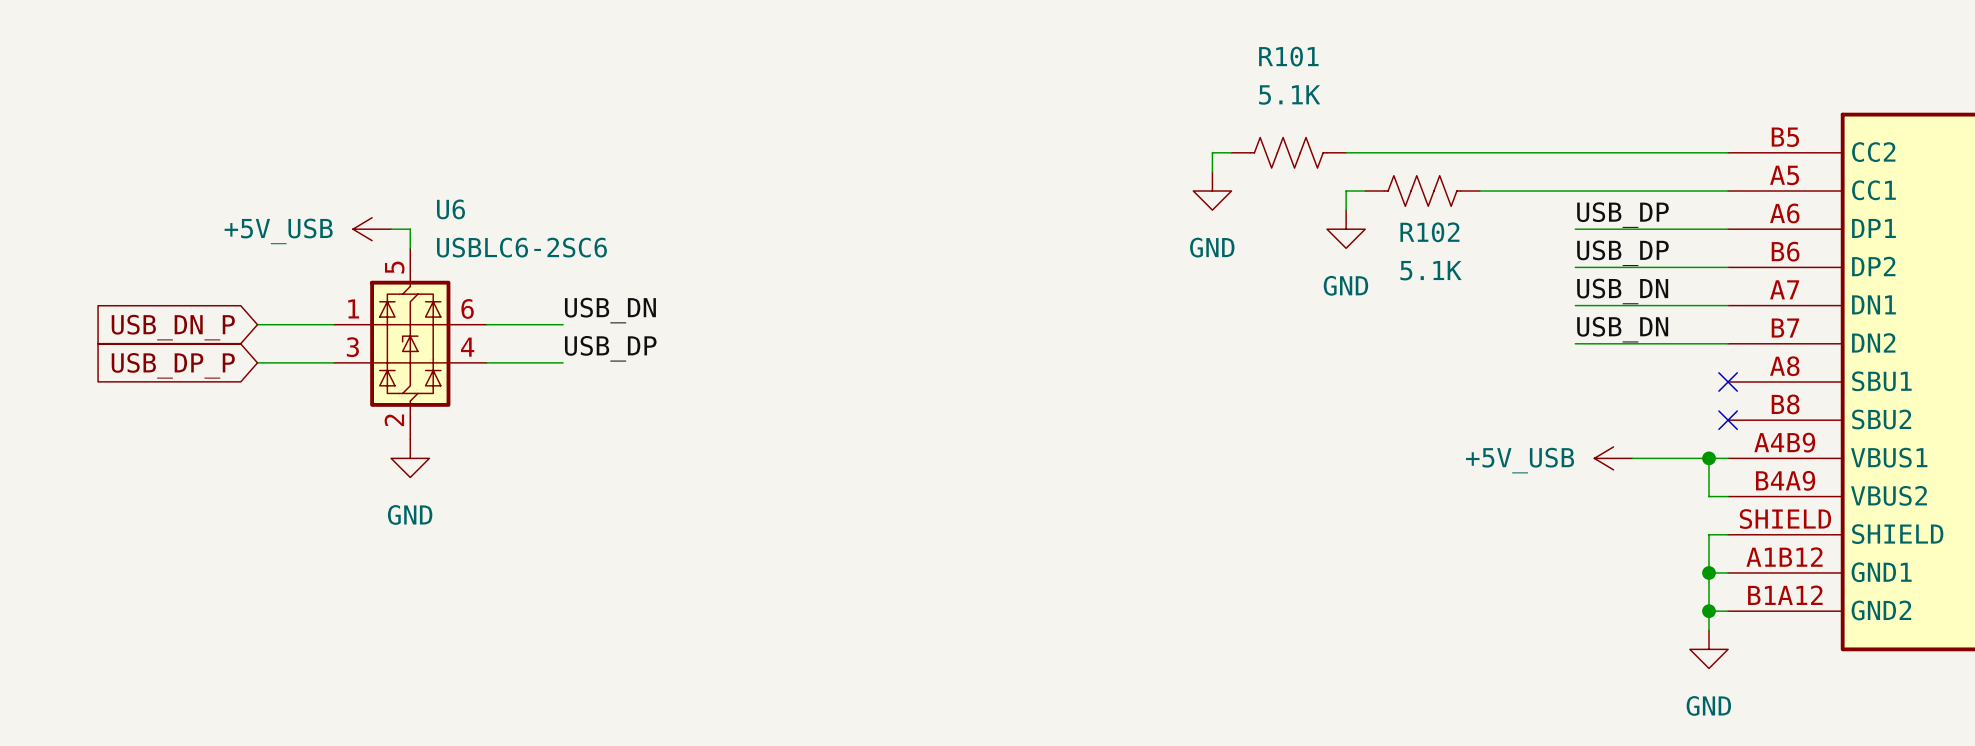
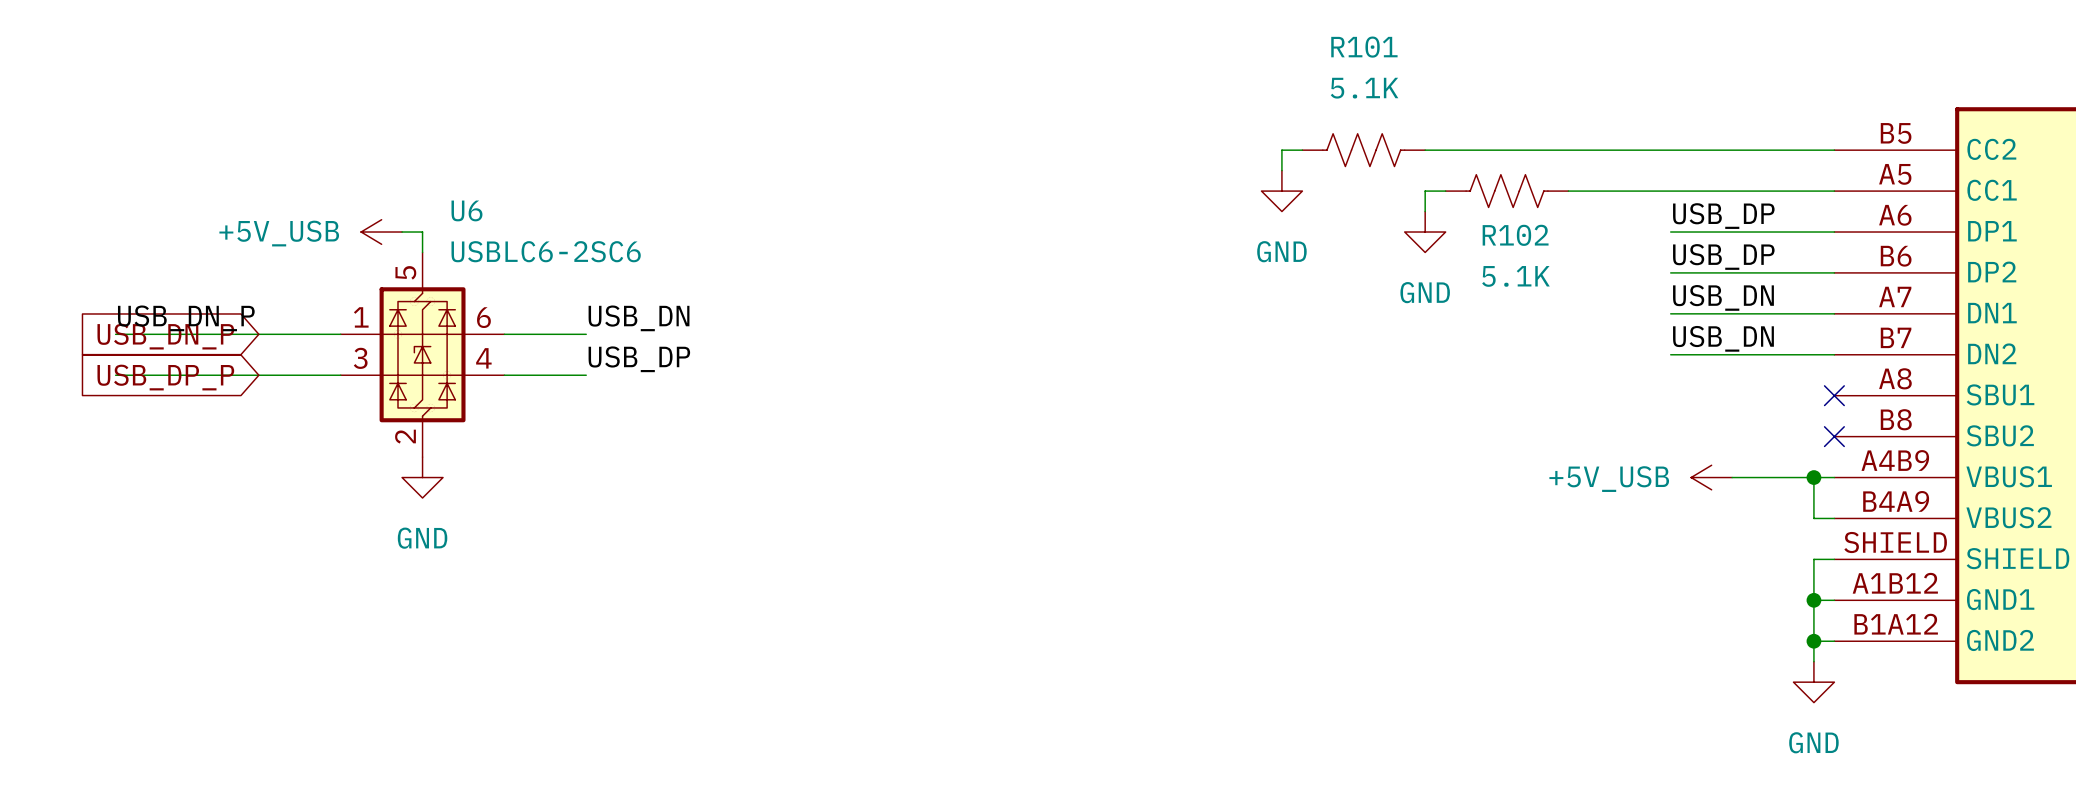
label: none -> USB_DN_P (186, 318)
wire: none -> (115, 334) (258, 334)
wire: none -> (115, 375) (258, 375)

